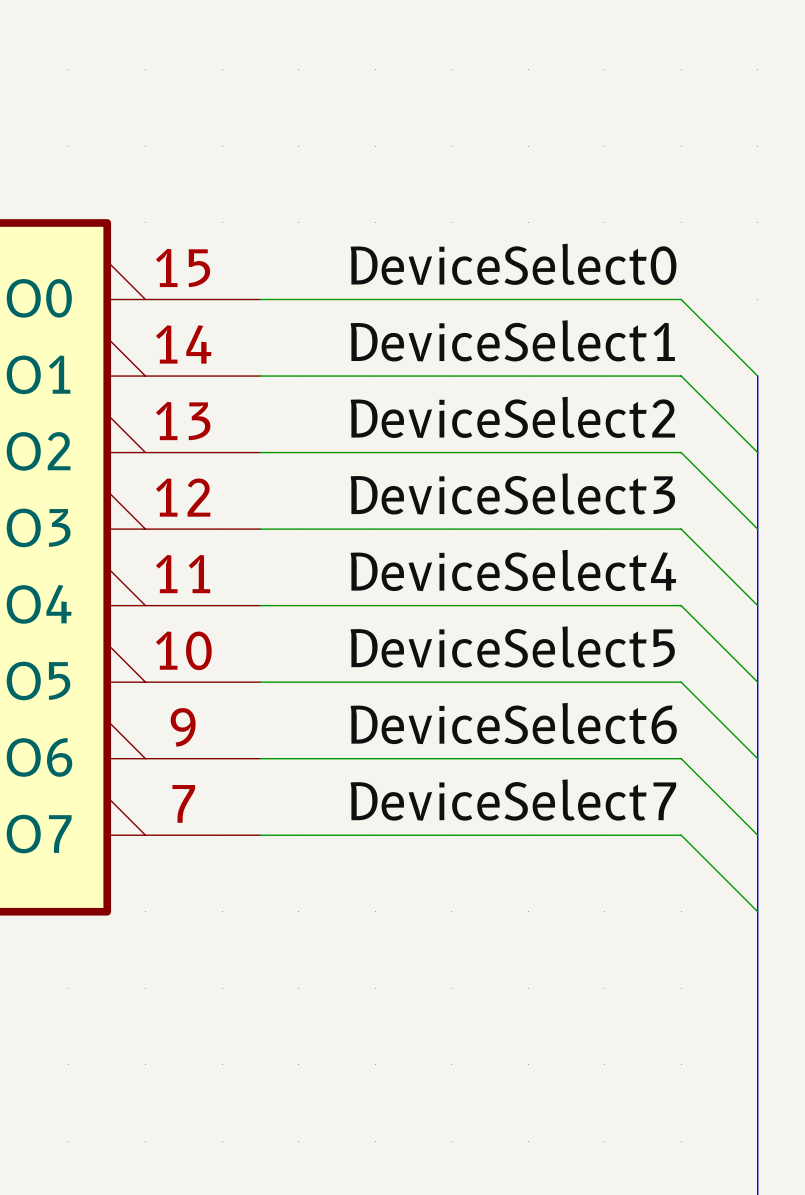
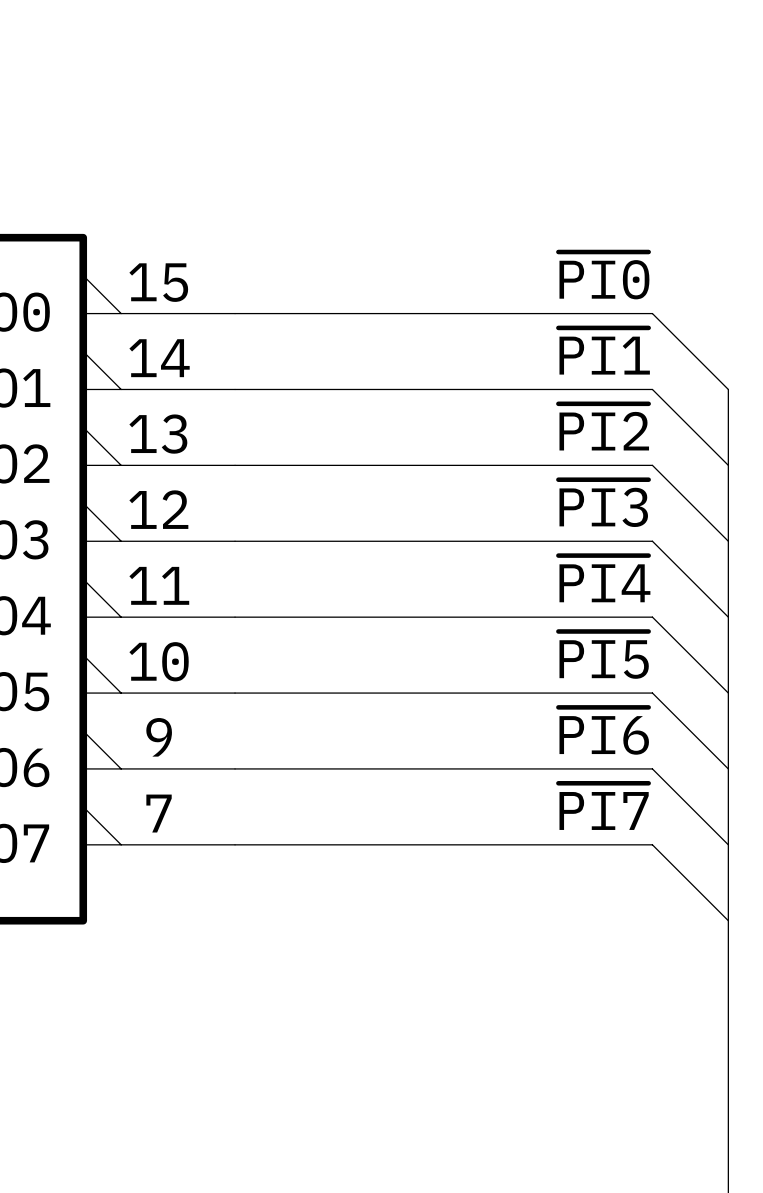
label: DeviceSelect0 (513, 264) -> ~{PI0} (603, 275)
label: DeviceSelect1 (512, 340) -> ~{PI1} (604, 351)
label: DeviceSelect2 (512, 417) -> ~{PI2} (603, 427)
label: DeviceSelect3 (512, 493) -> ~{PI3} (603, 503)
label: DeviceSelect4 (513, 570) -> ~{PI4} (604, 578)
label: DeviceSelect5 (512, 647) -> ~{PI5} (603, 655)
label: DeviceSelect6 (513, 723) -> ~{PI6} (603, 731)
label: DeviceSelect7 (513, 800) -> ~{PI7} (603, 806)

